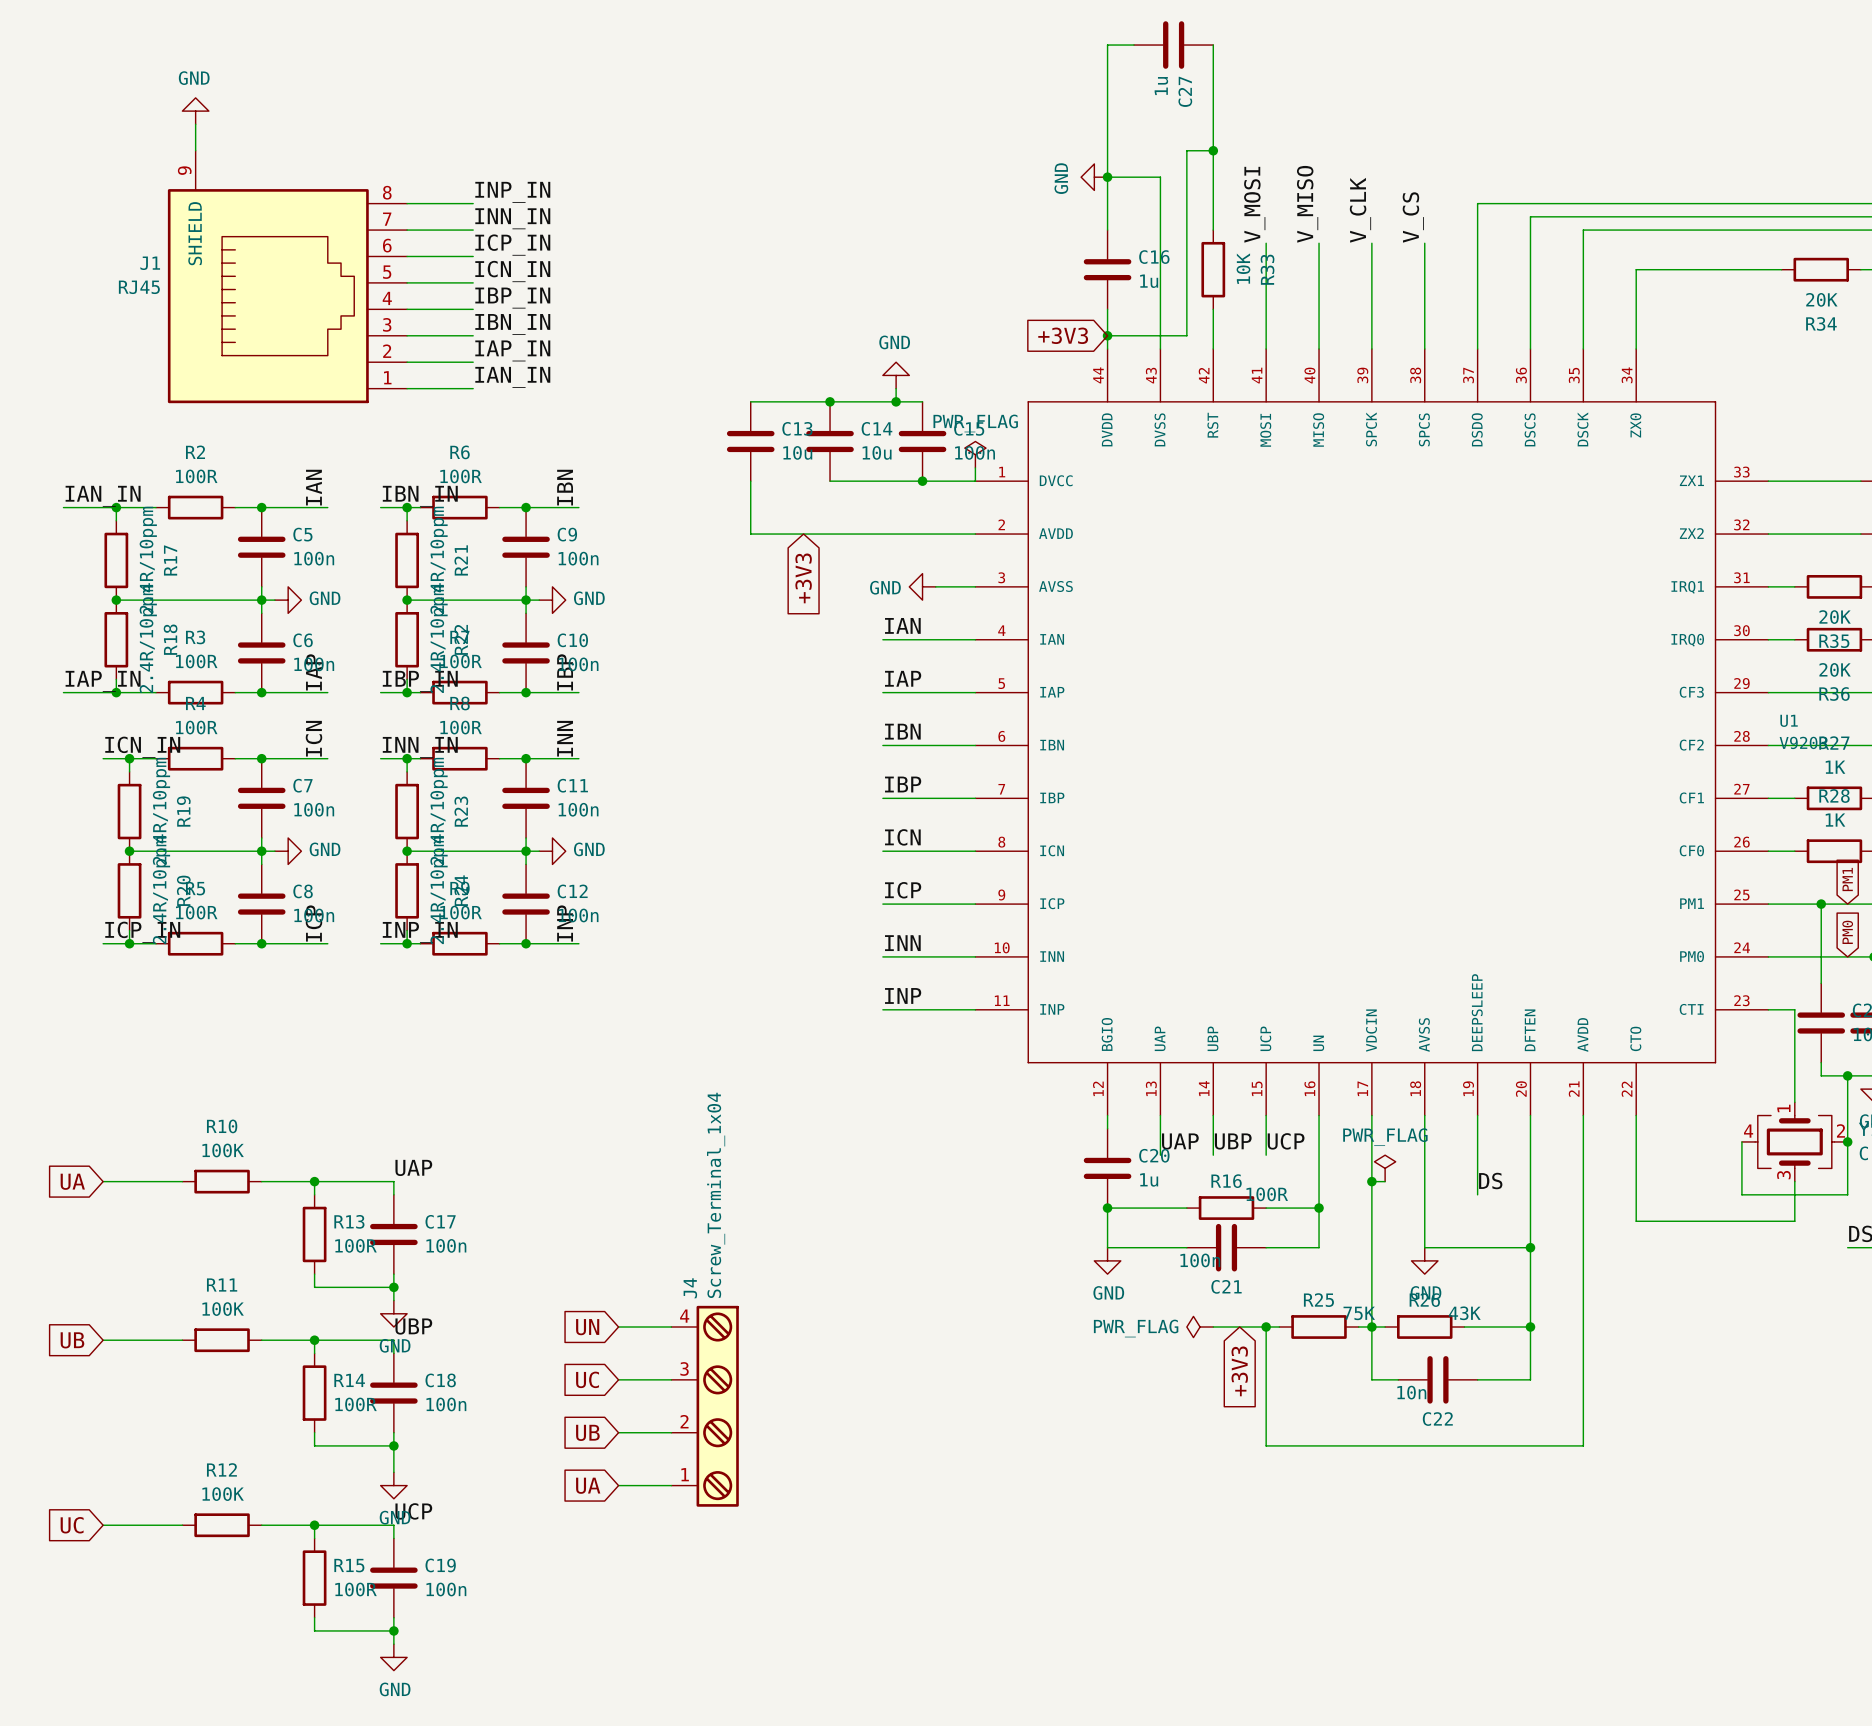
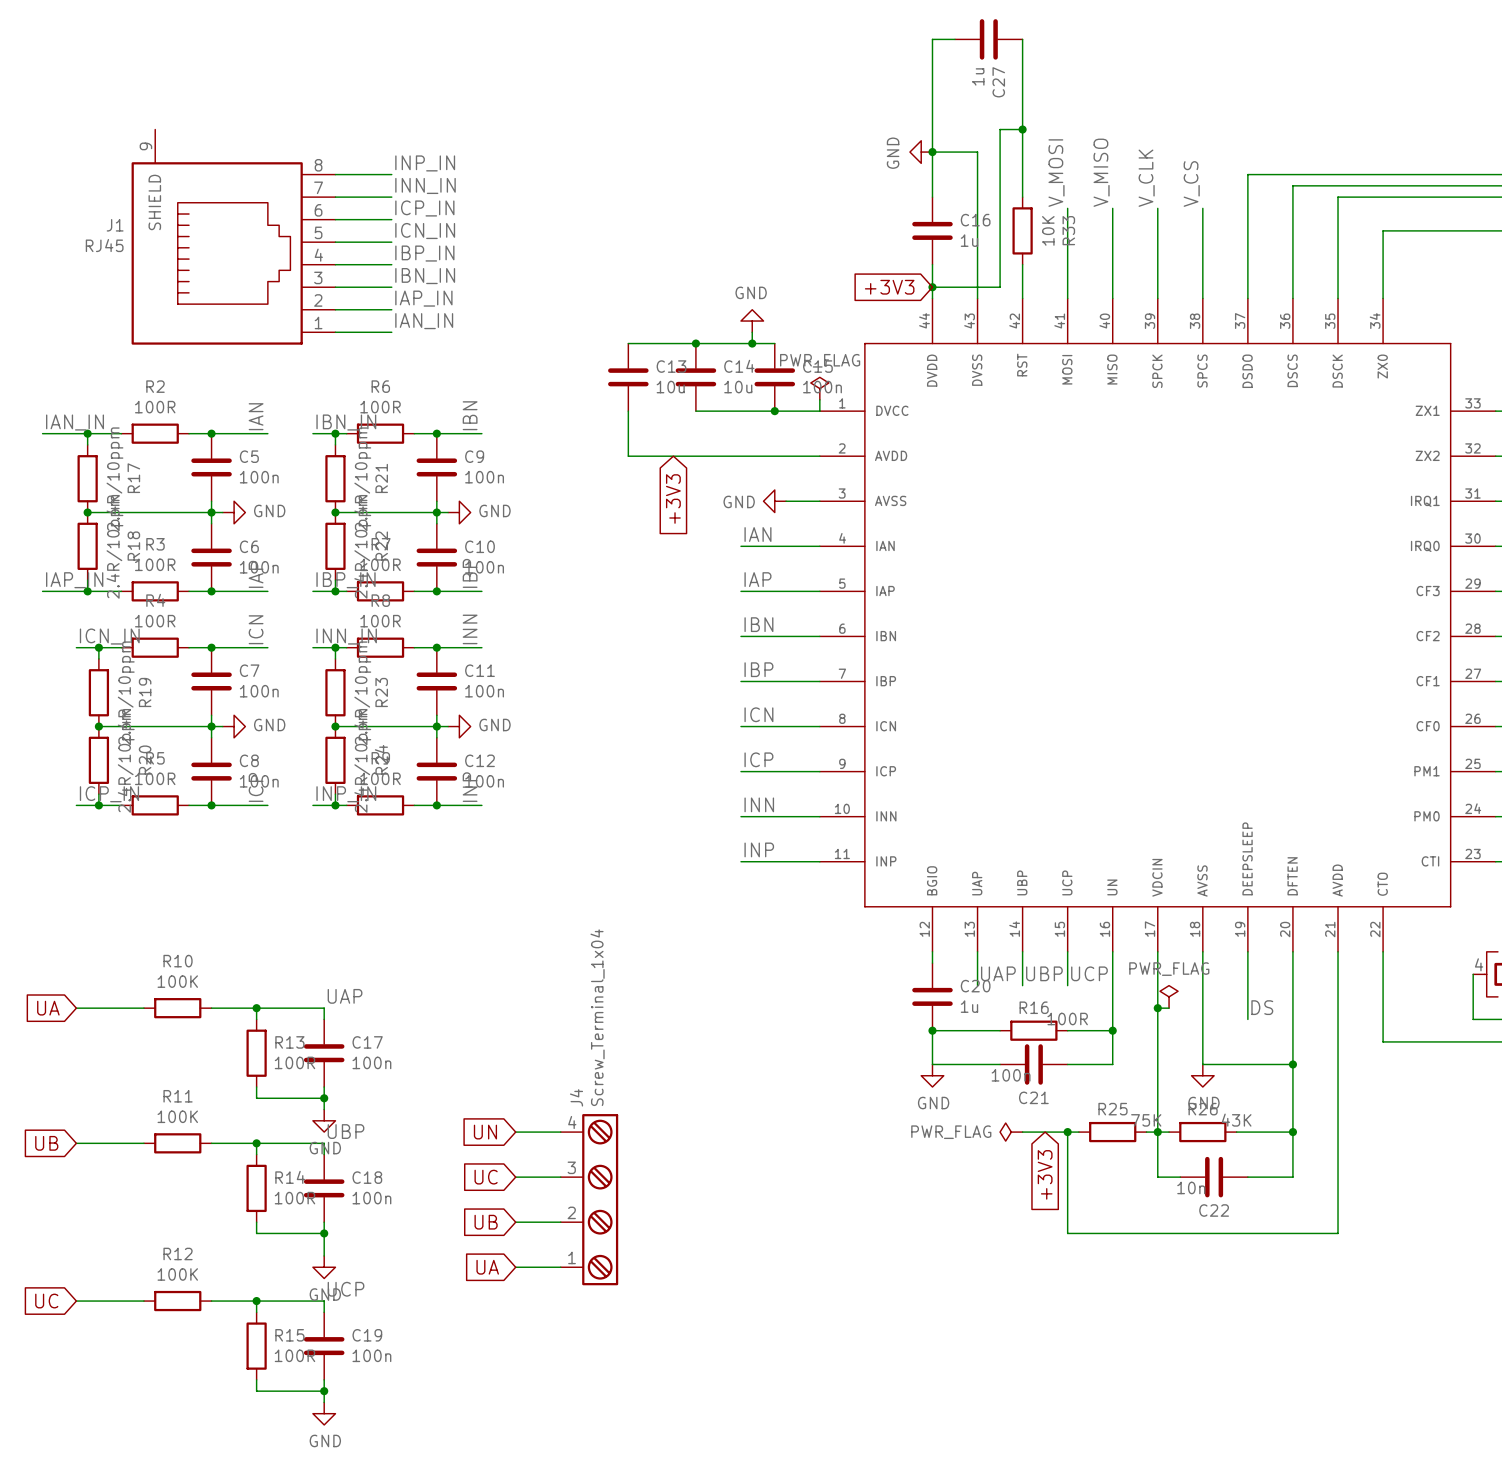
power symbol: GND (195, 111) -> none
wire: (195, 124) (195, 150) -> none

